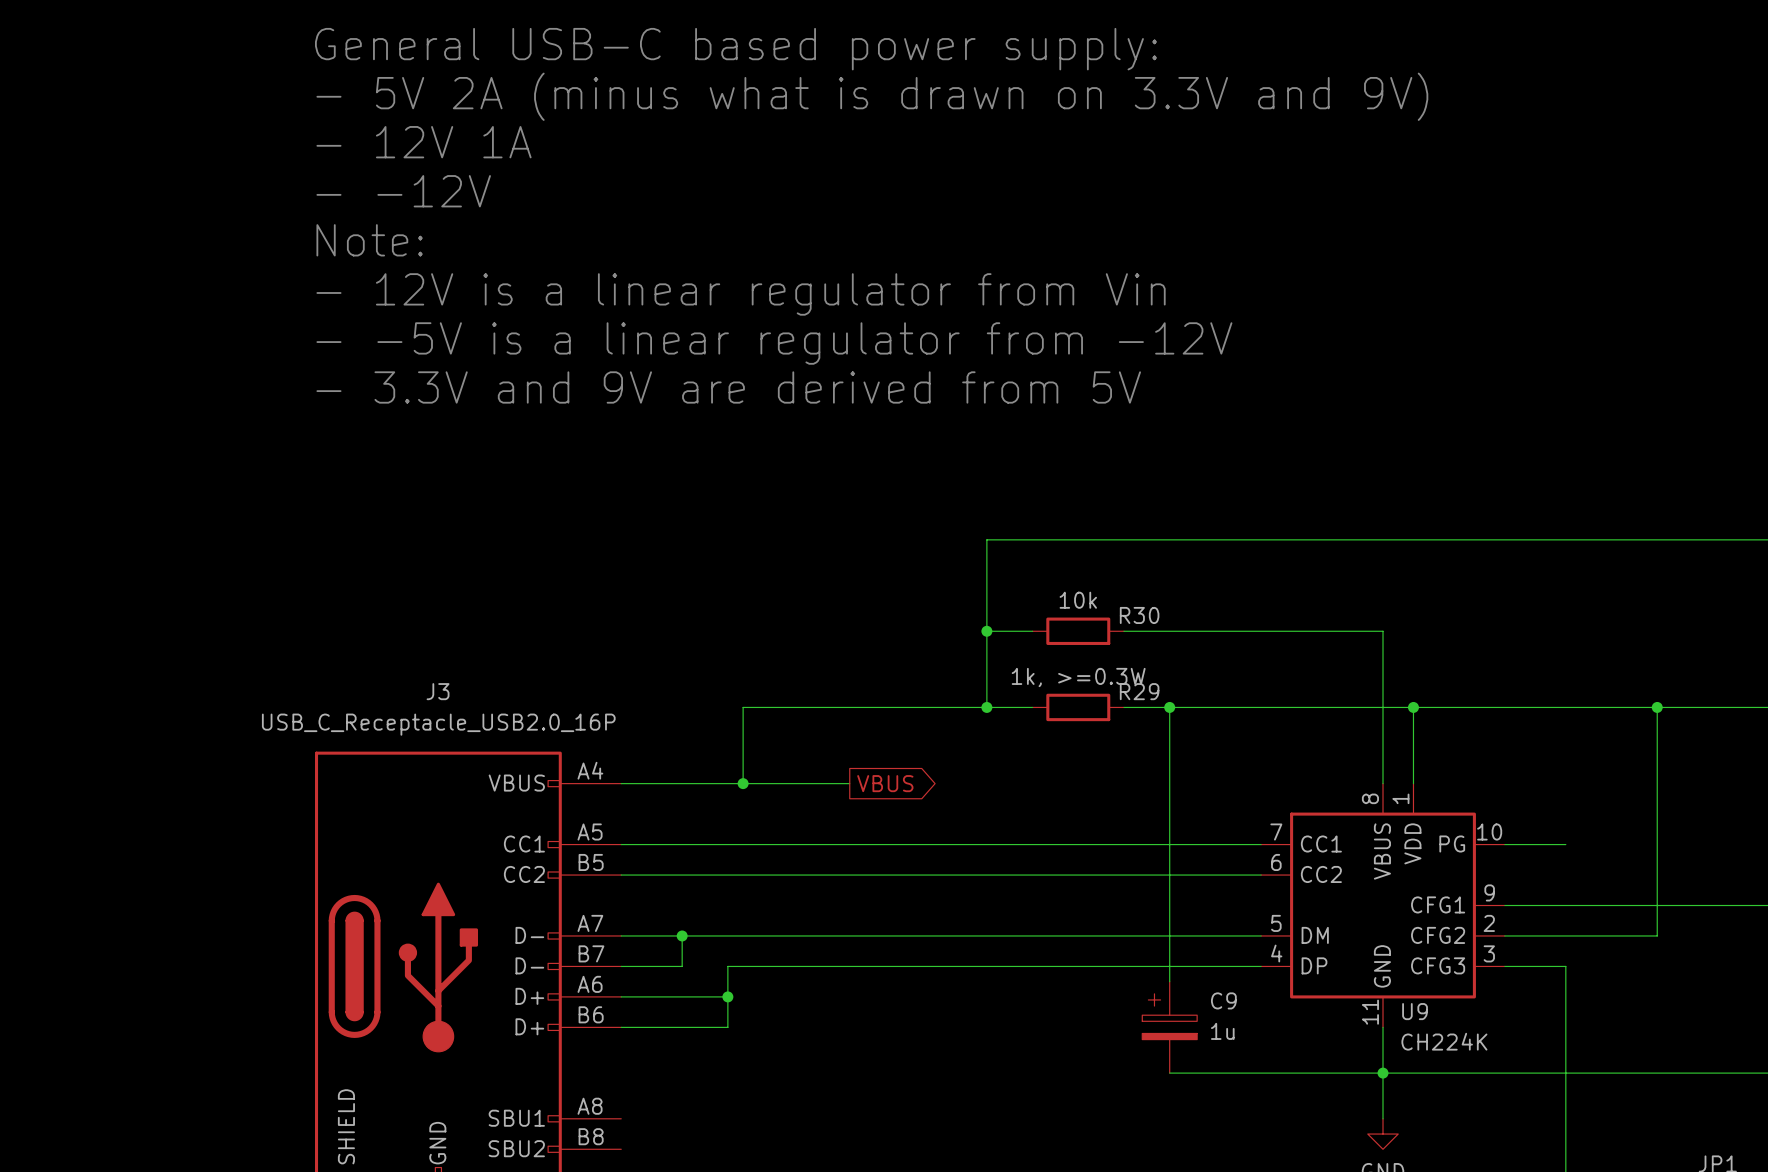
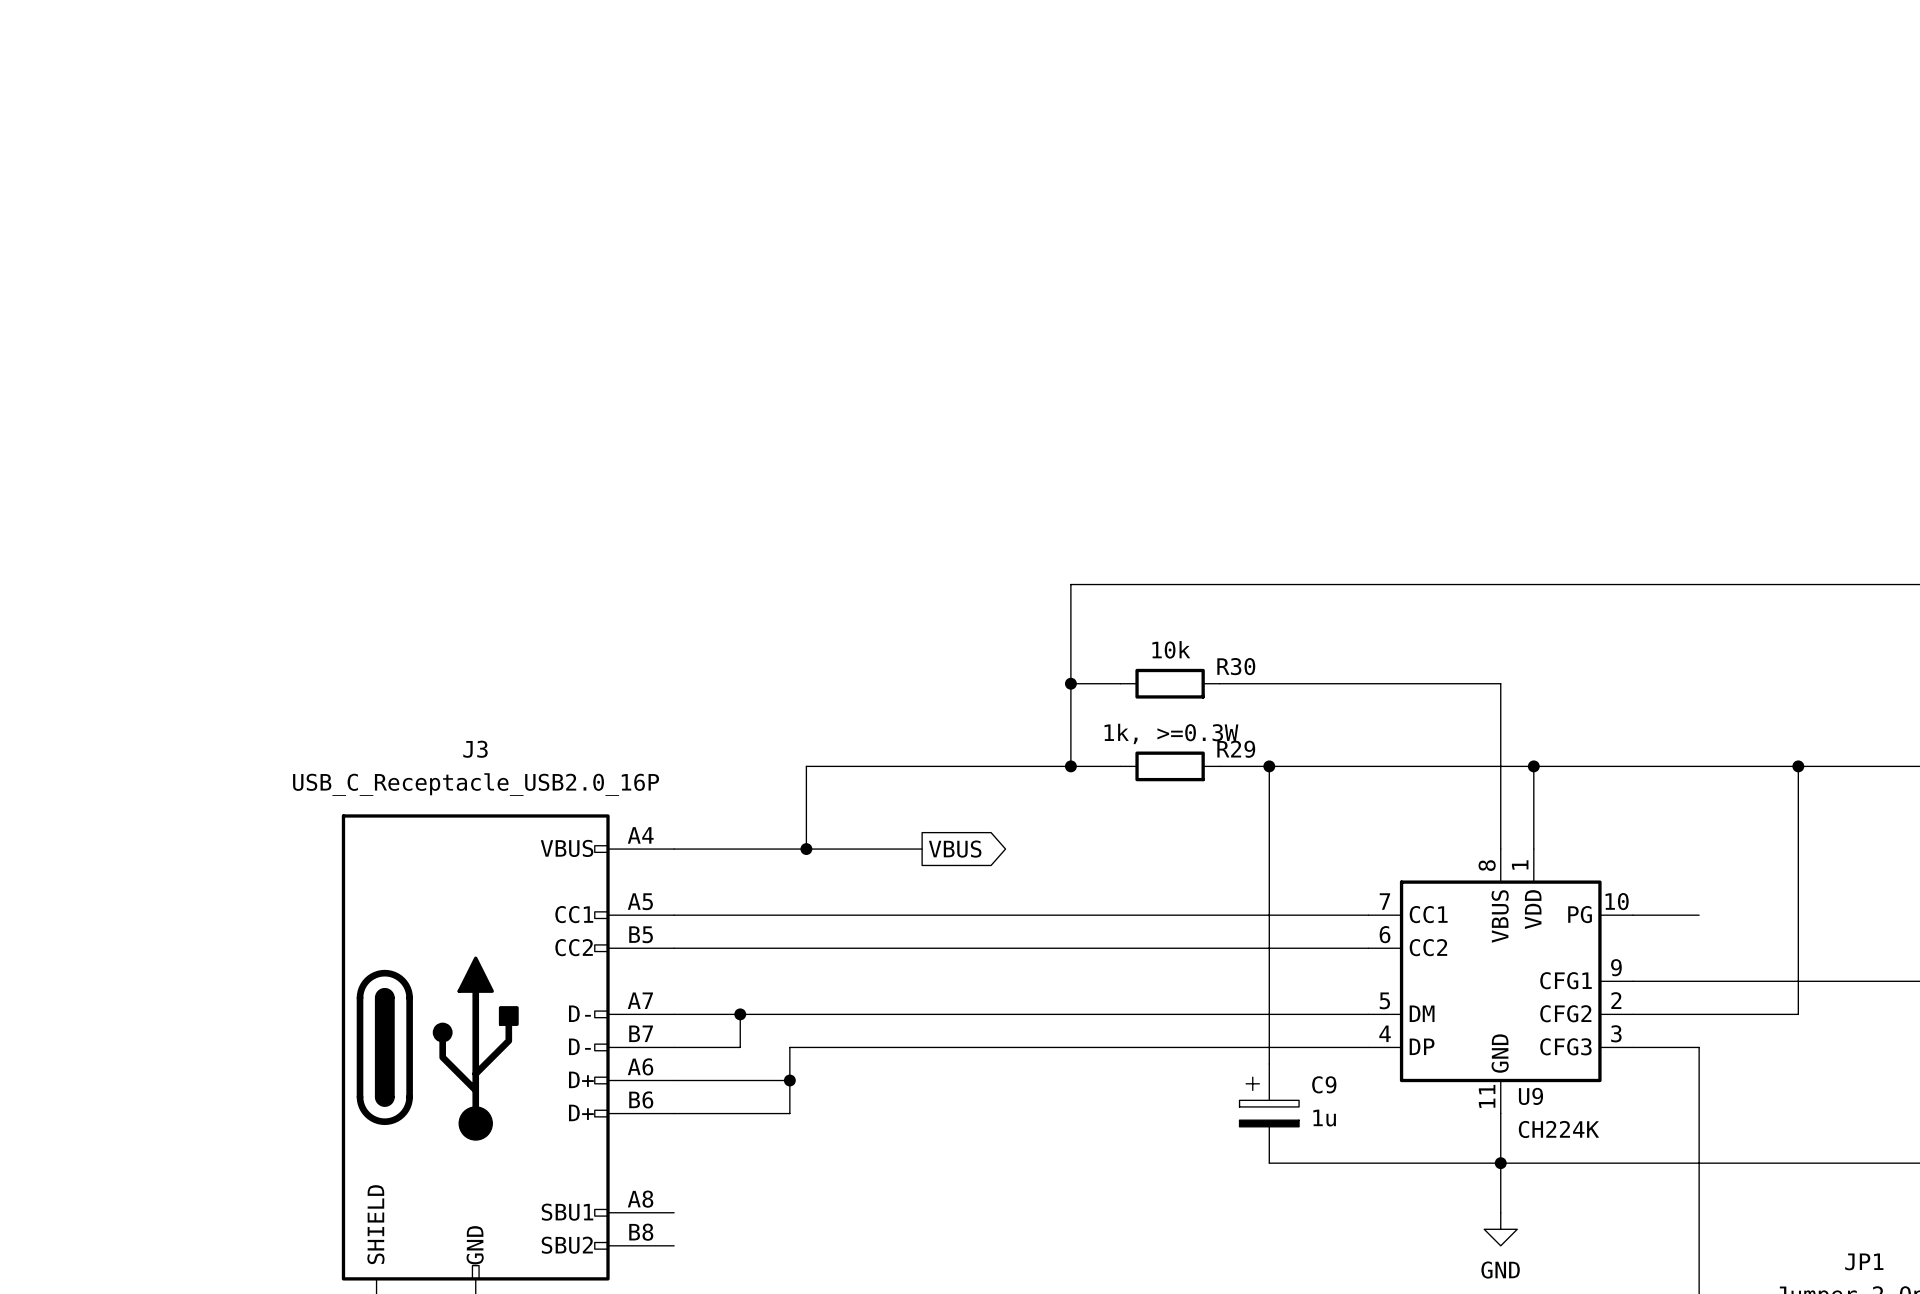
text: General USB-C based power supply: (735, 49) -> none
text: - 5V 2A (minus what is drawn on 3.3V and 9V) (872, 96) -> none
text: - 12V 1A (424, 142) -> none
text: - -12V (403, 191) -> none
text: Note: (369, 240) -> none
text: - 12V is a linear regulator from Vin (741, 294) -> none
text: - -5V is a linear regulator from -12V (774, 343) -> none
text: - 3.3V and 9V are derived from 5V (728, 387) -> none

